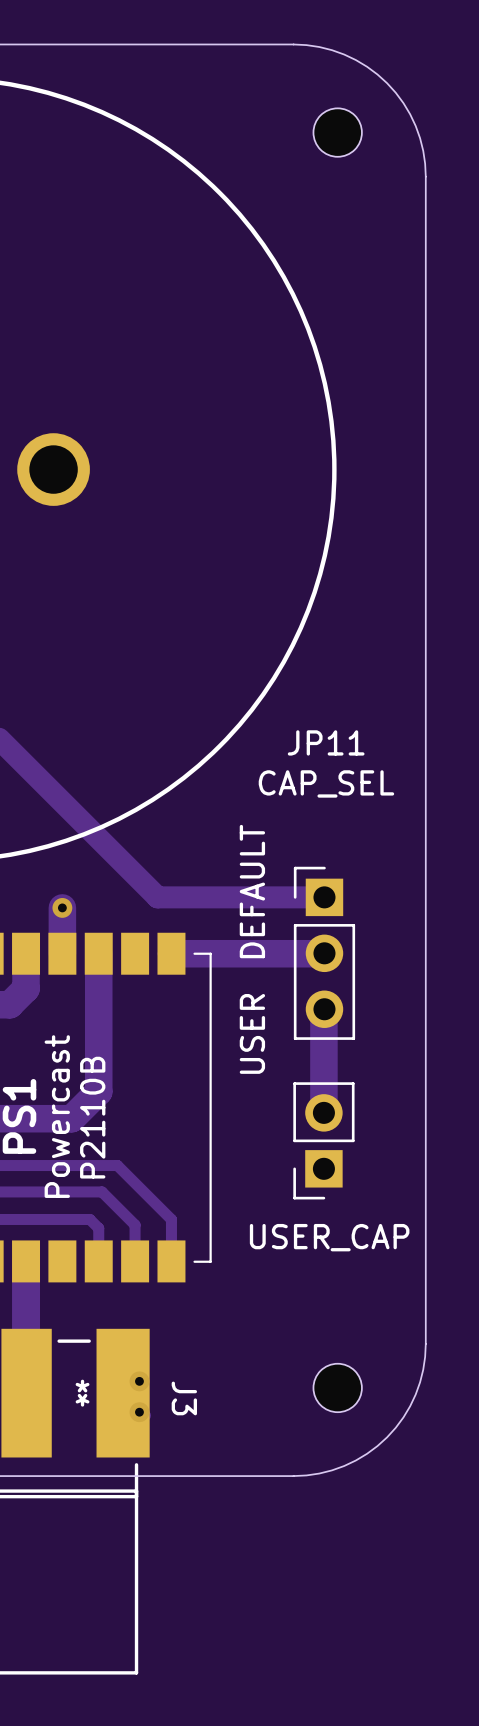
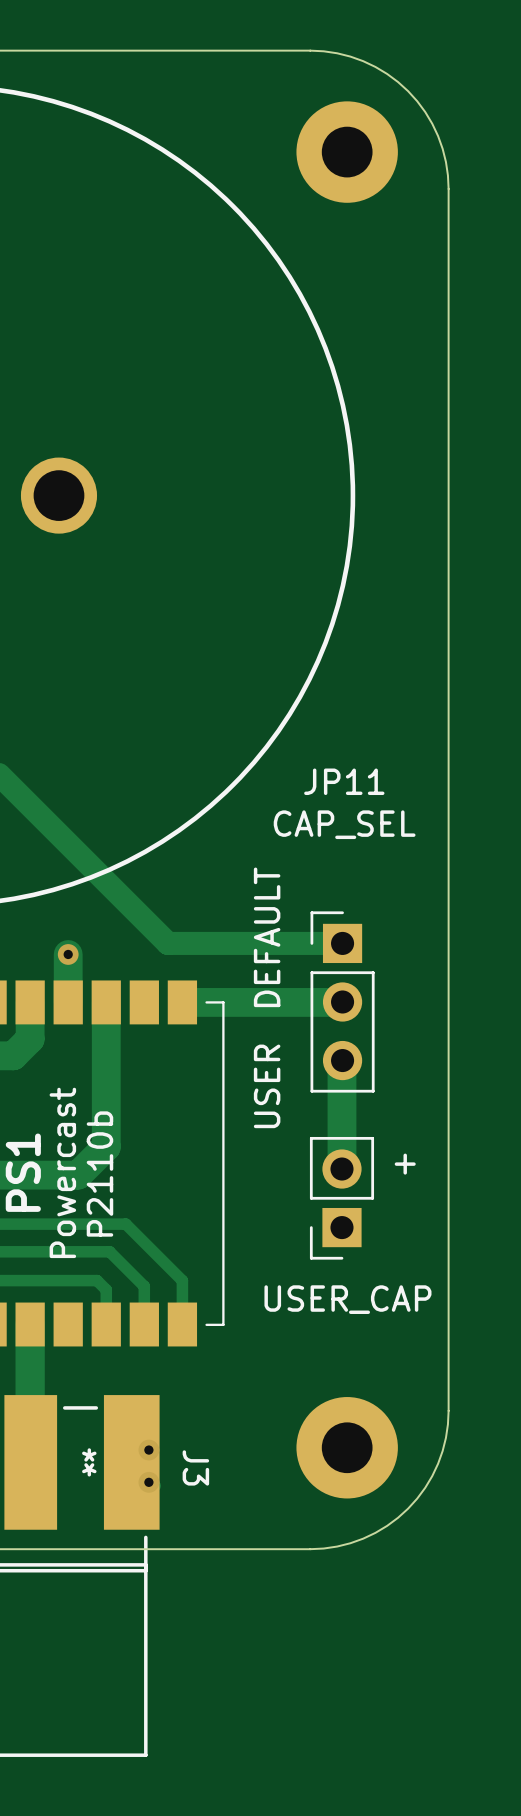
part footprint: [313, 108, 362, 157] -> [296, 101, 398, 203]
text: none -> + (405, 1164)
text: P2110B (92, 1117) -> P2110b (99, 1174)
part footprint: [313, 1363, 362, 1413] -> [296, 1397, 398, 1499]

